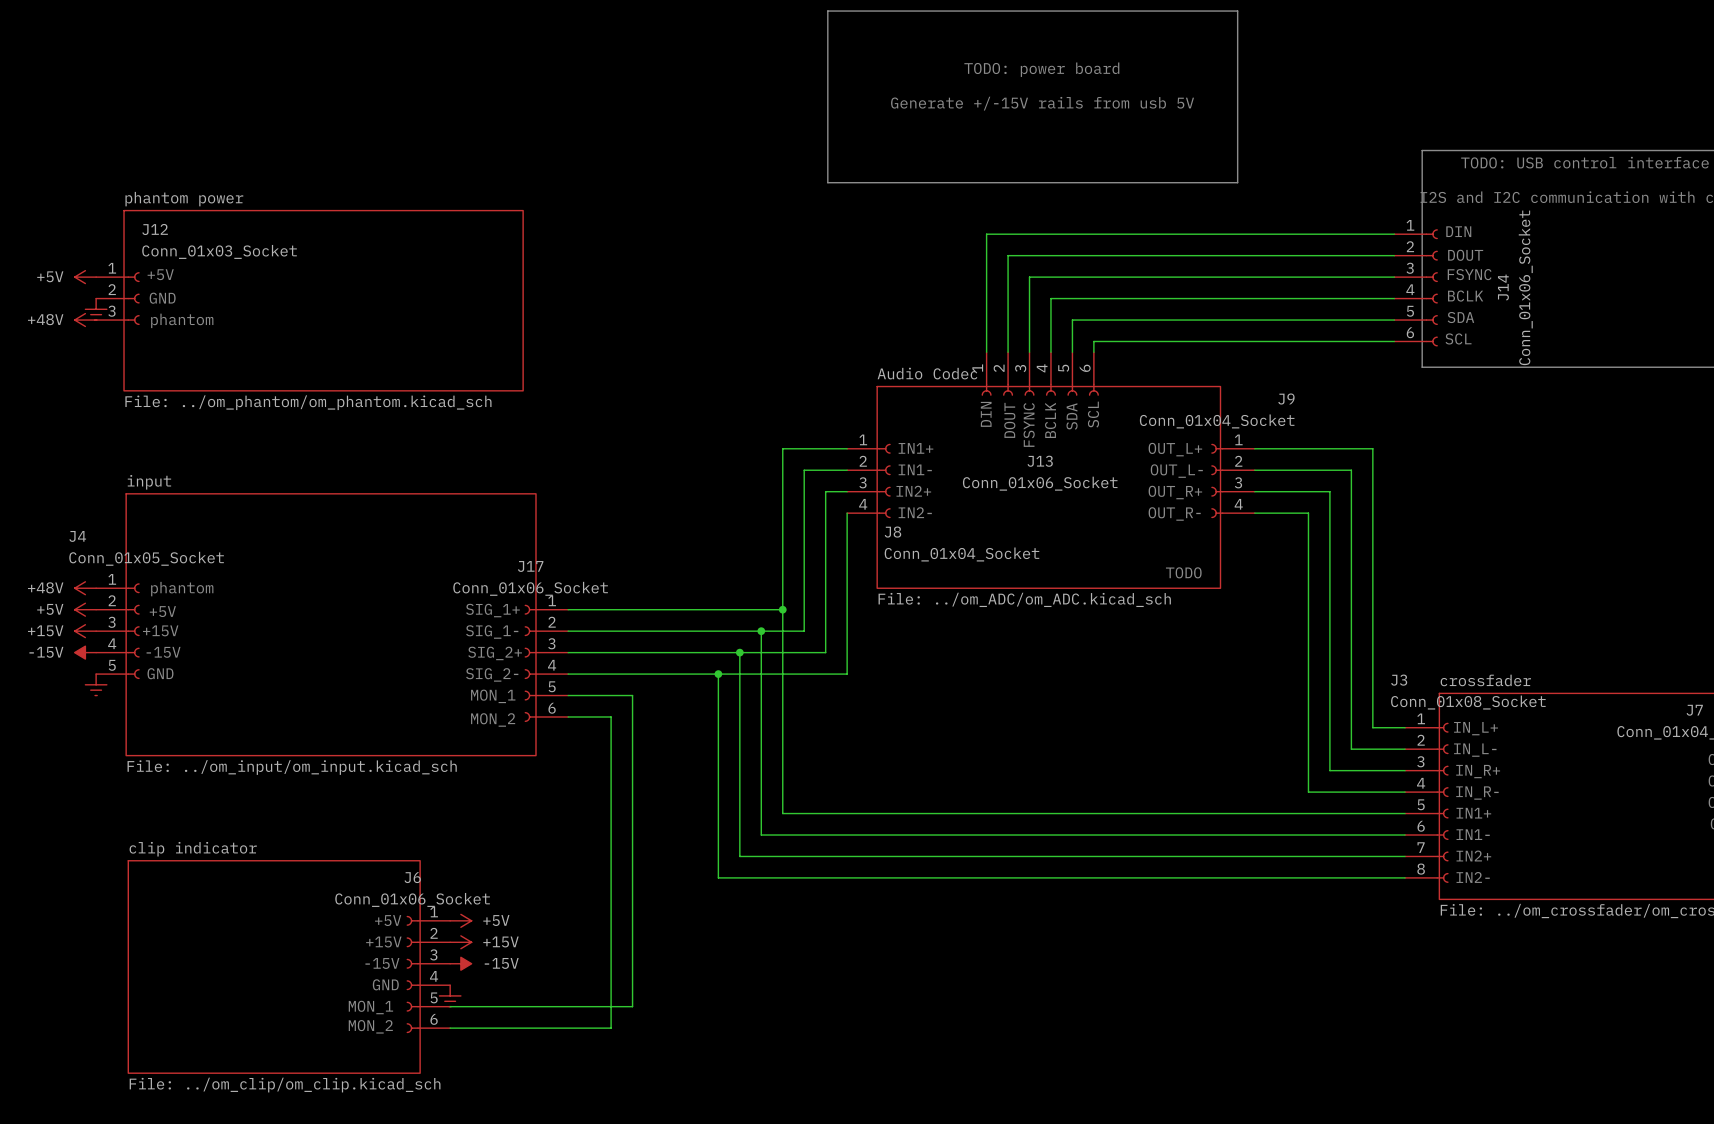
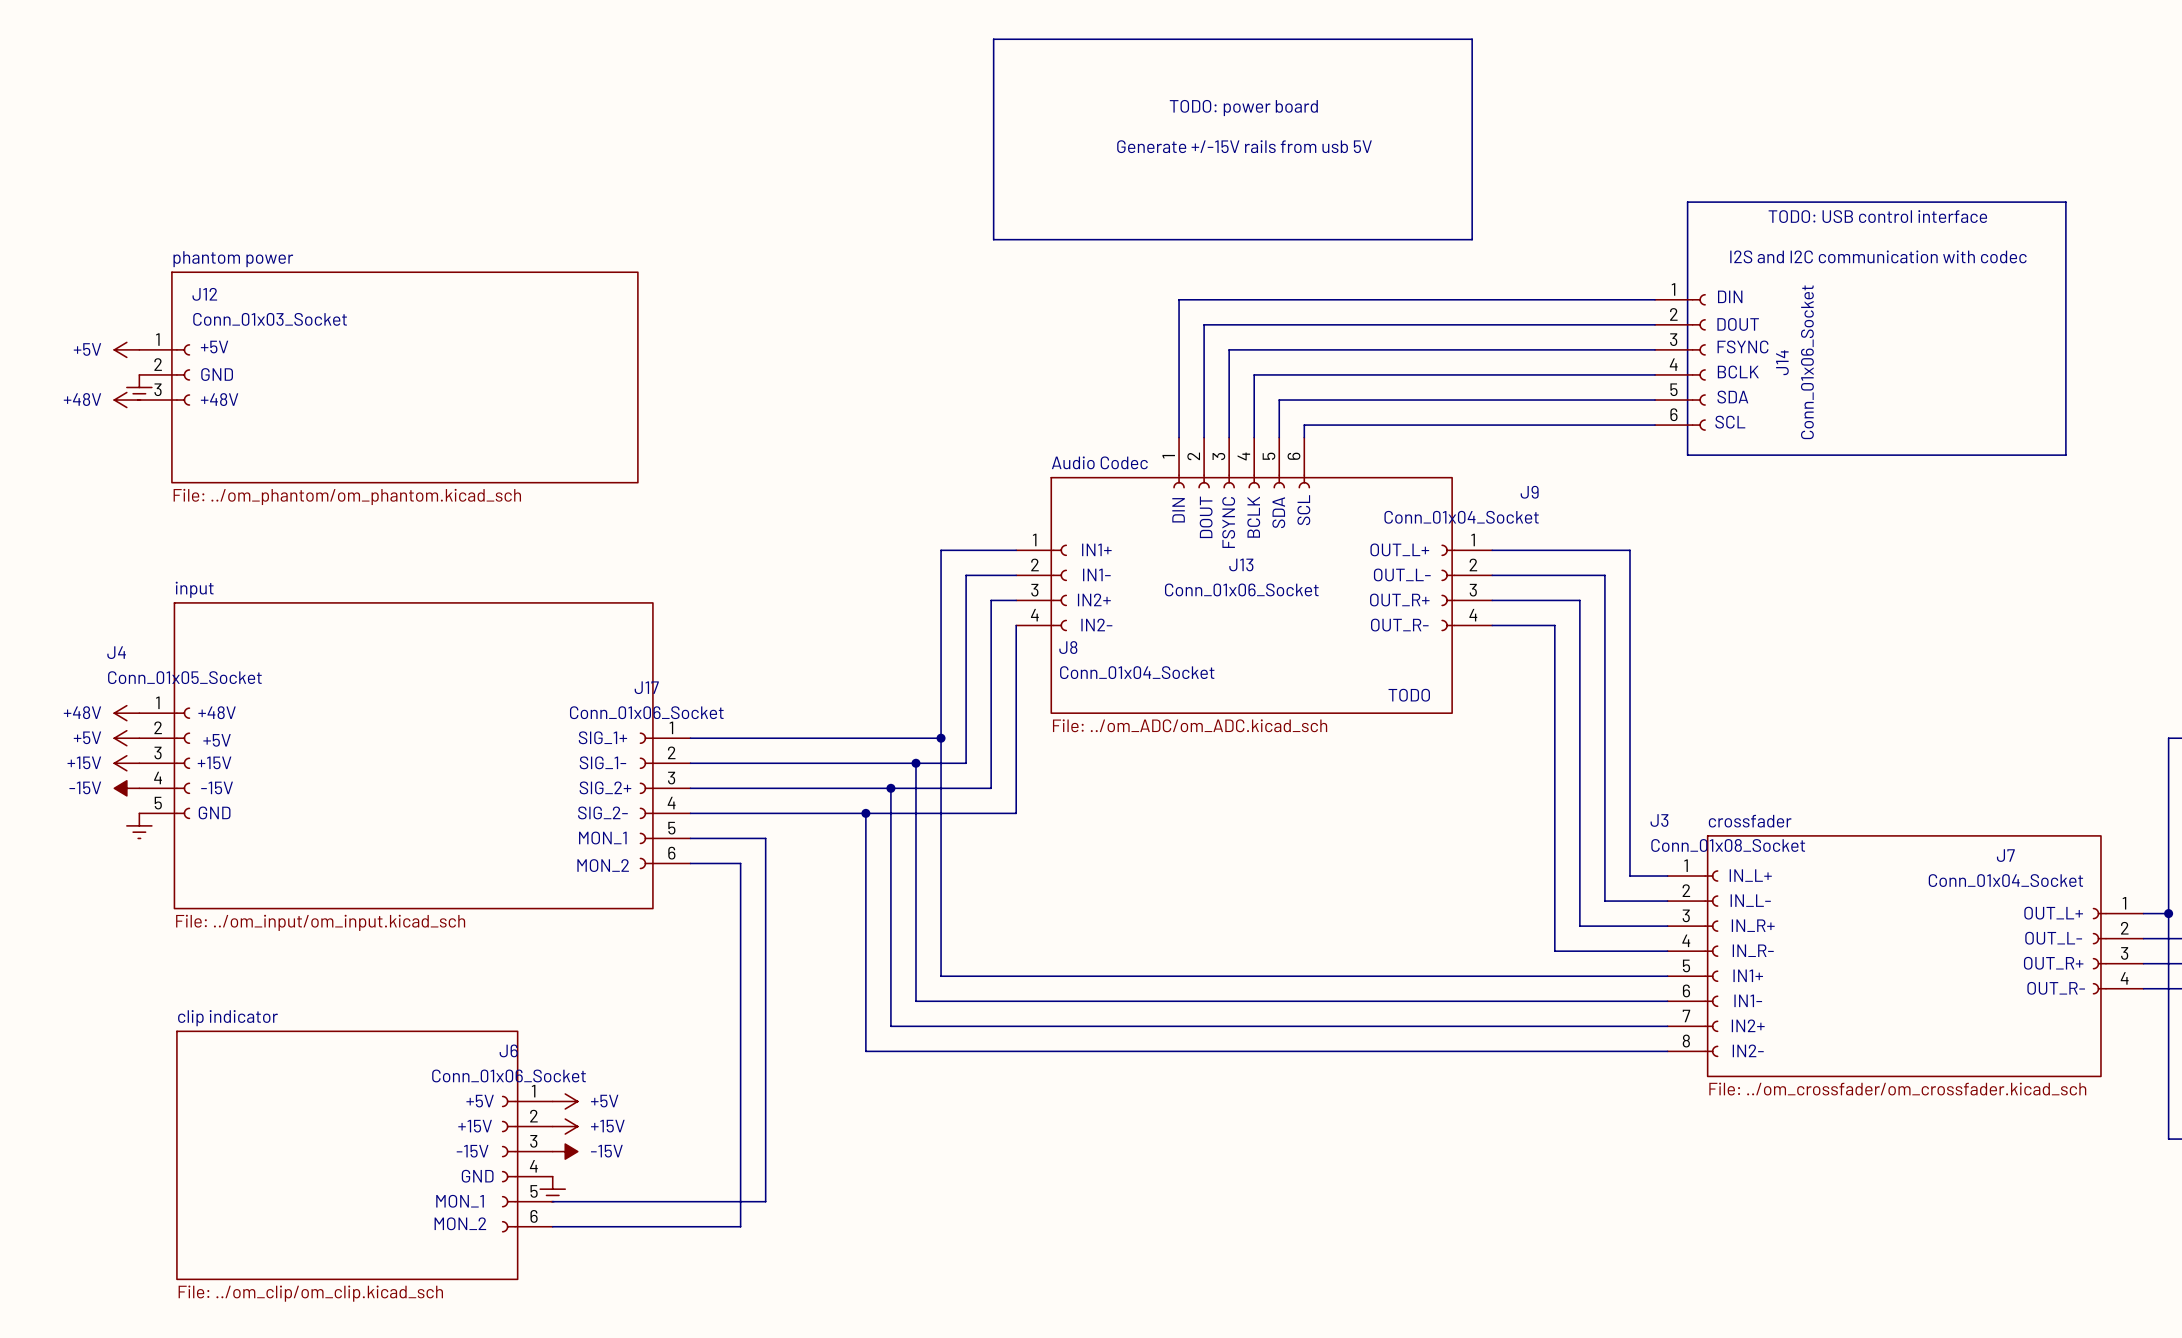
text: none -> +48V (219, 399)
text: phantom (182, 320) -> none
text: none -> +48V (217, 712)
text: phantom (182, 589) -> none

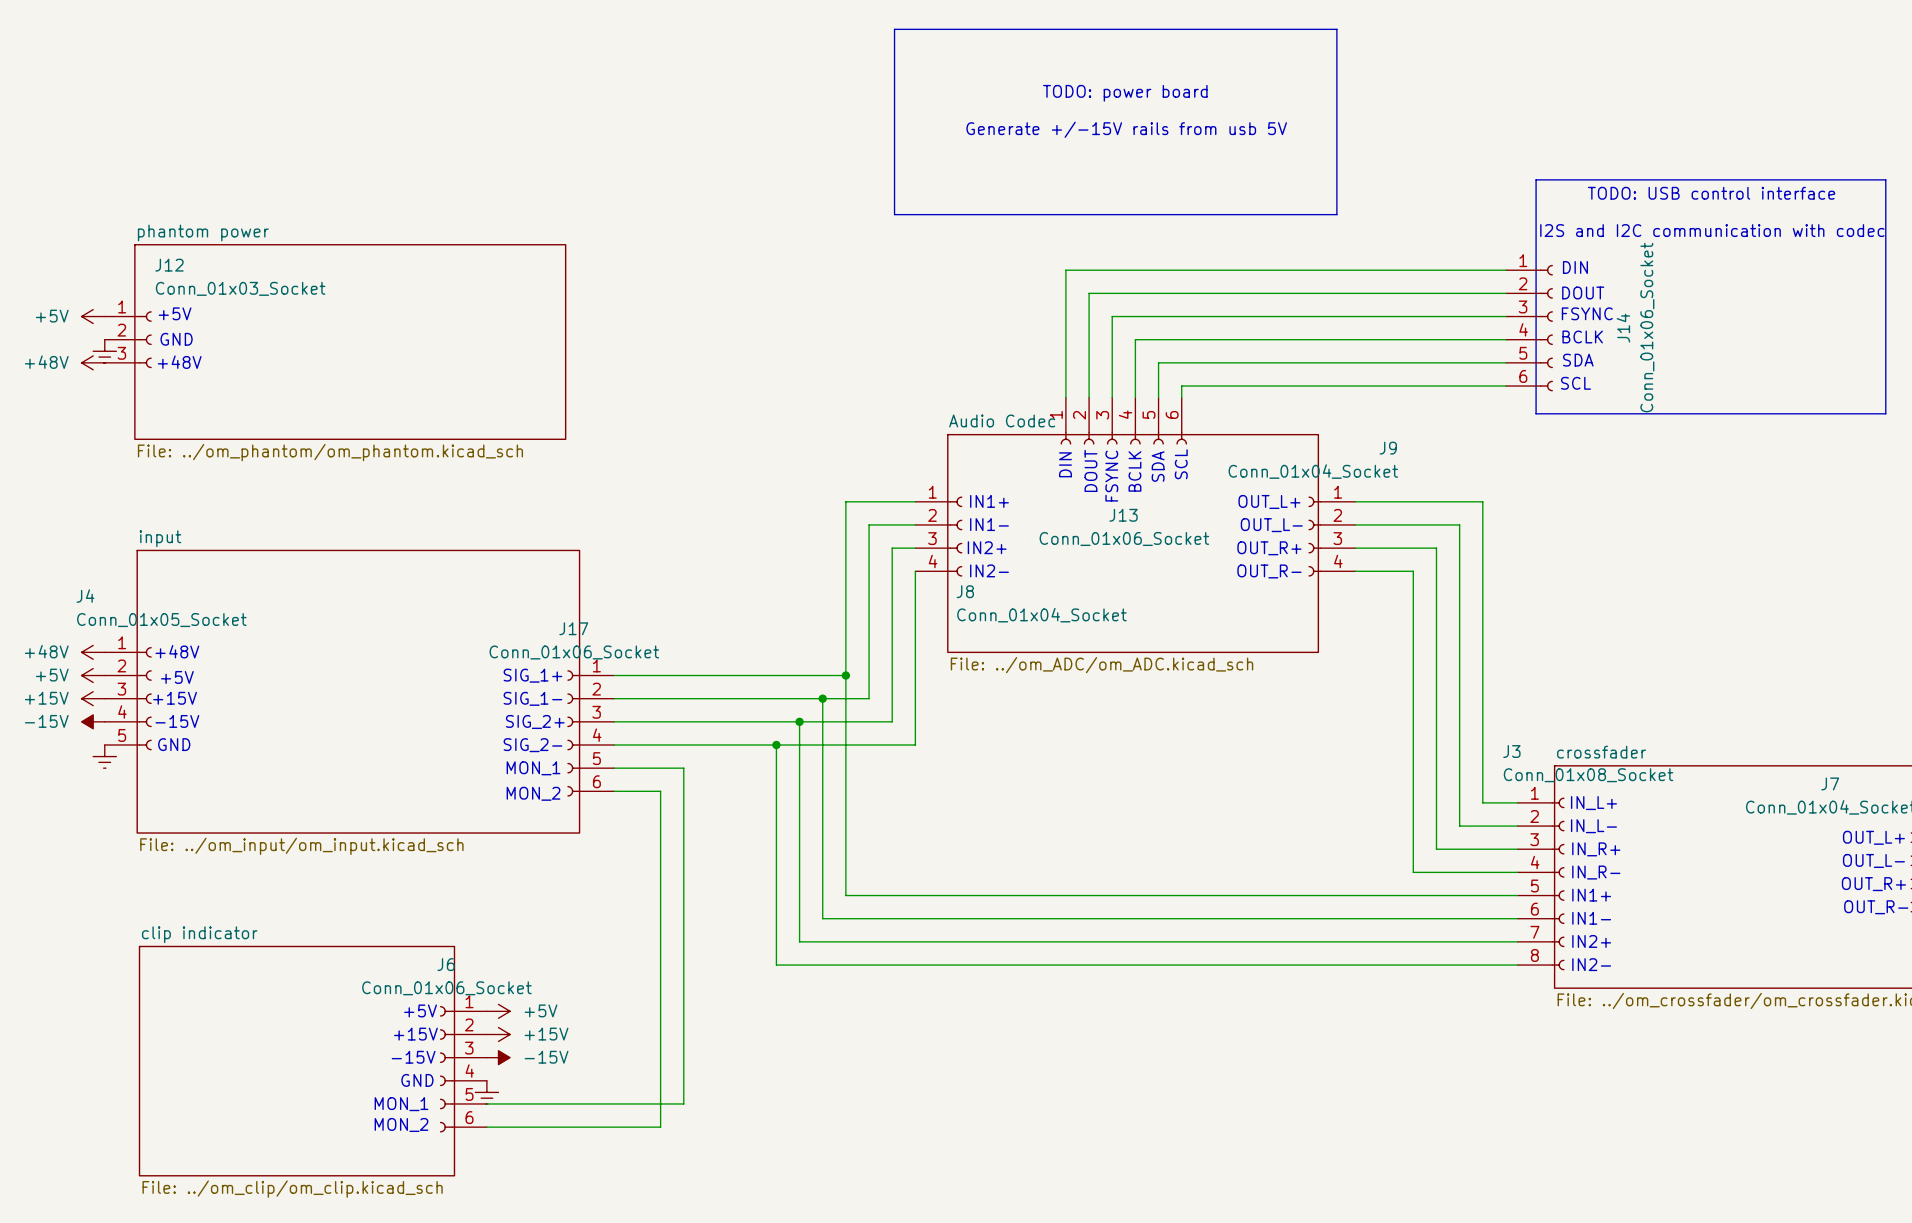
text: TODO (1409, 695) -> none

